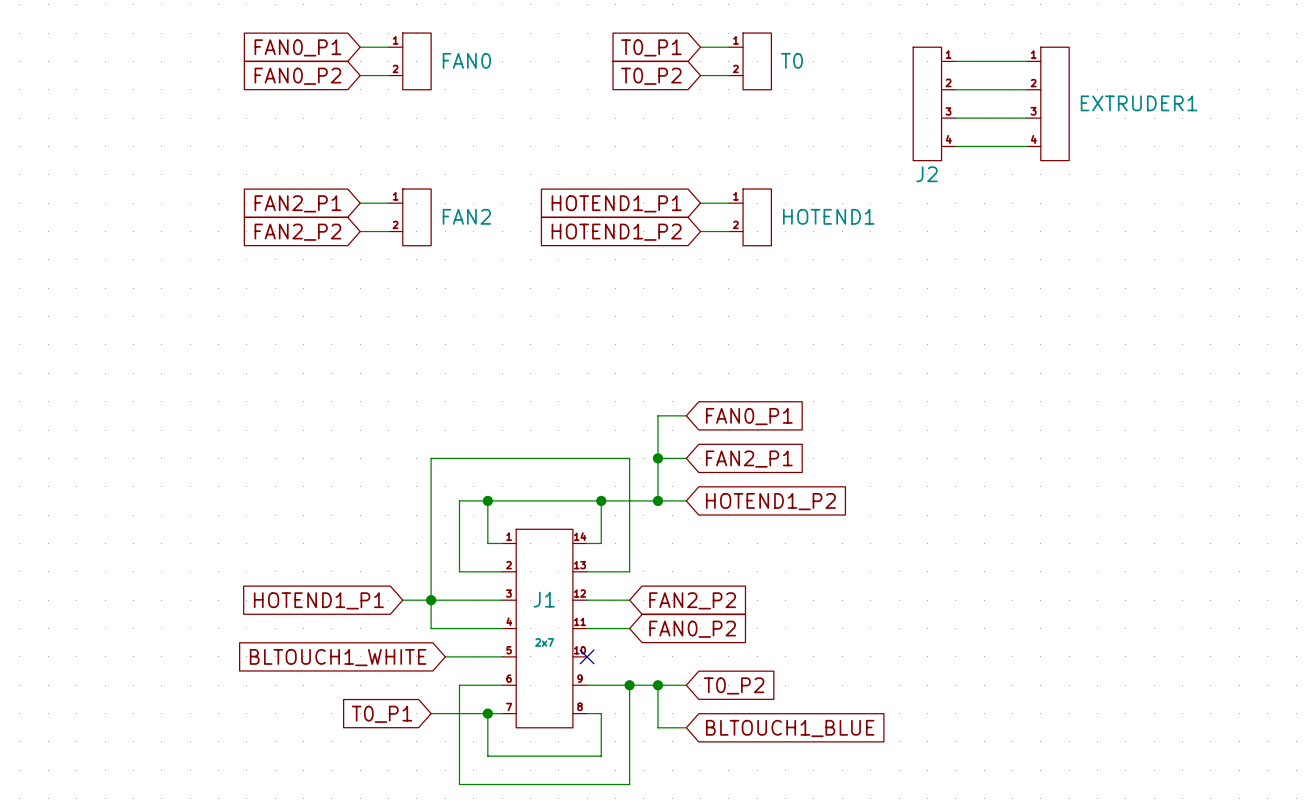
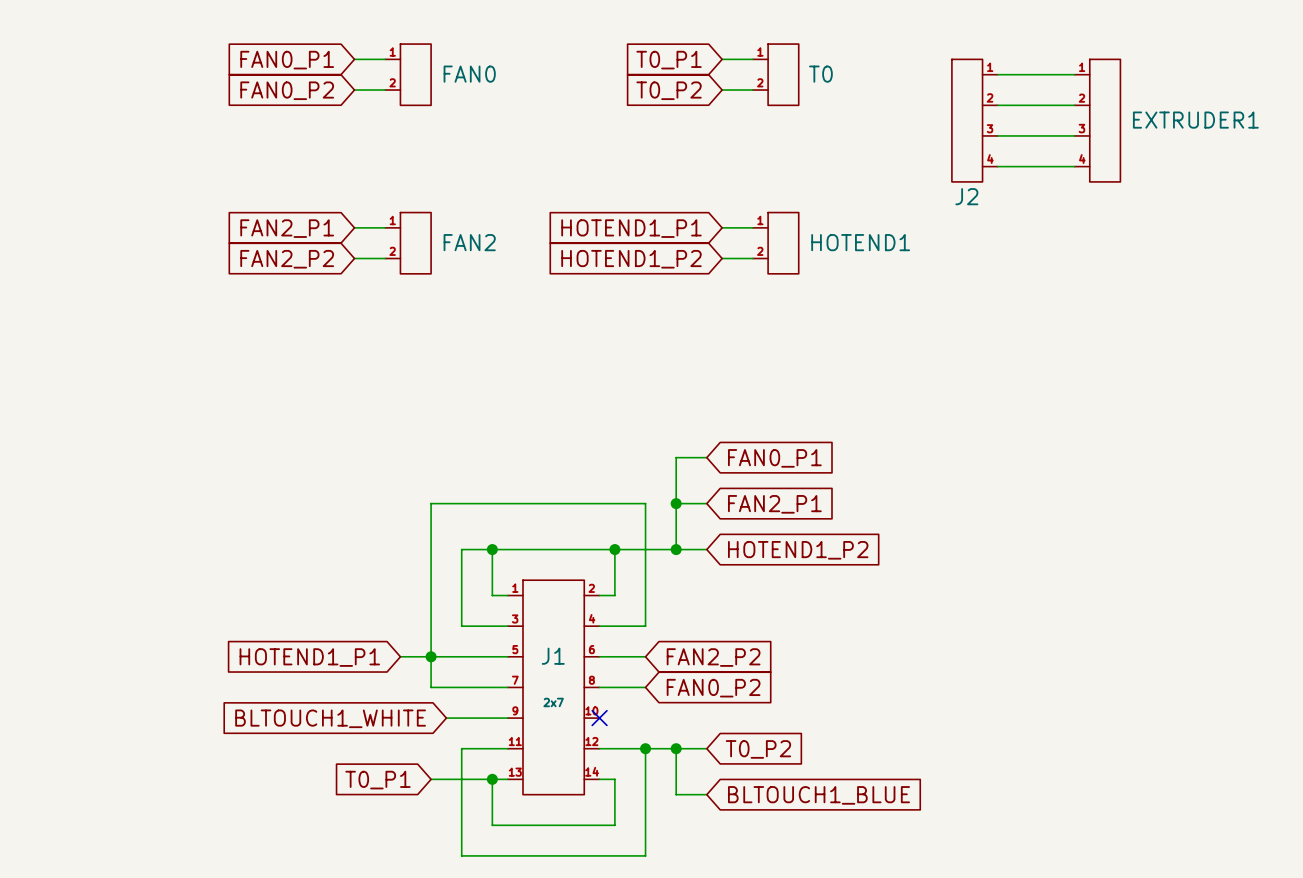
J1 symbol: [502, 529, 588, 728] -> [507, 580, 600, 795]

